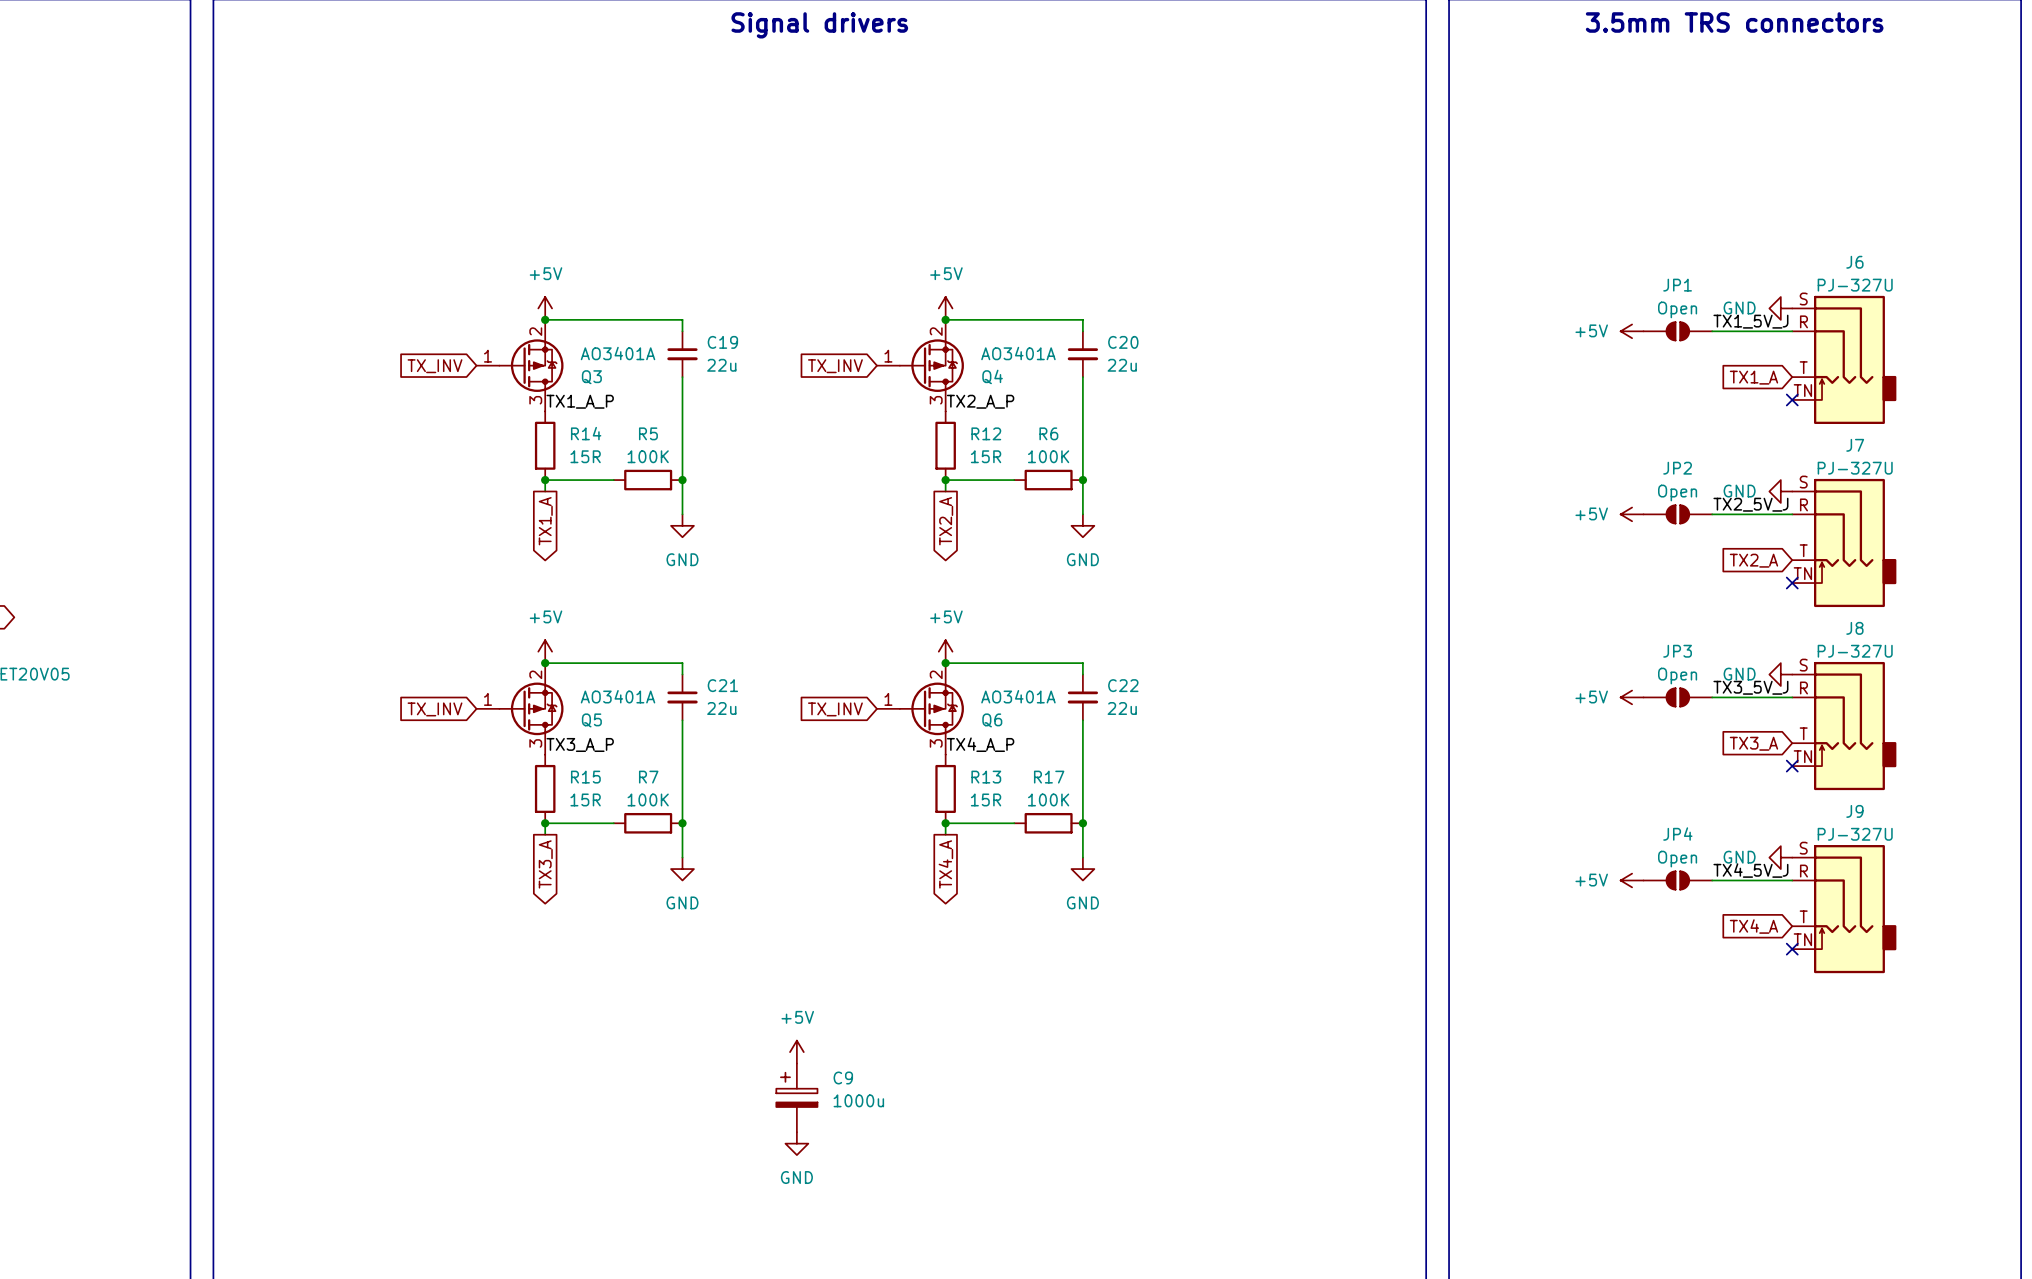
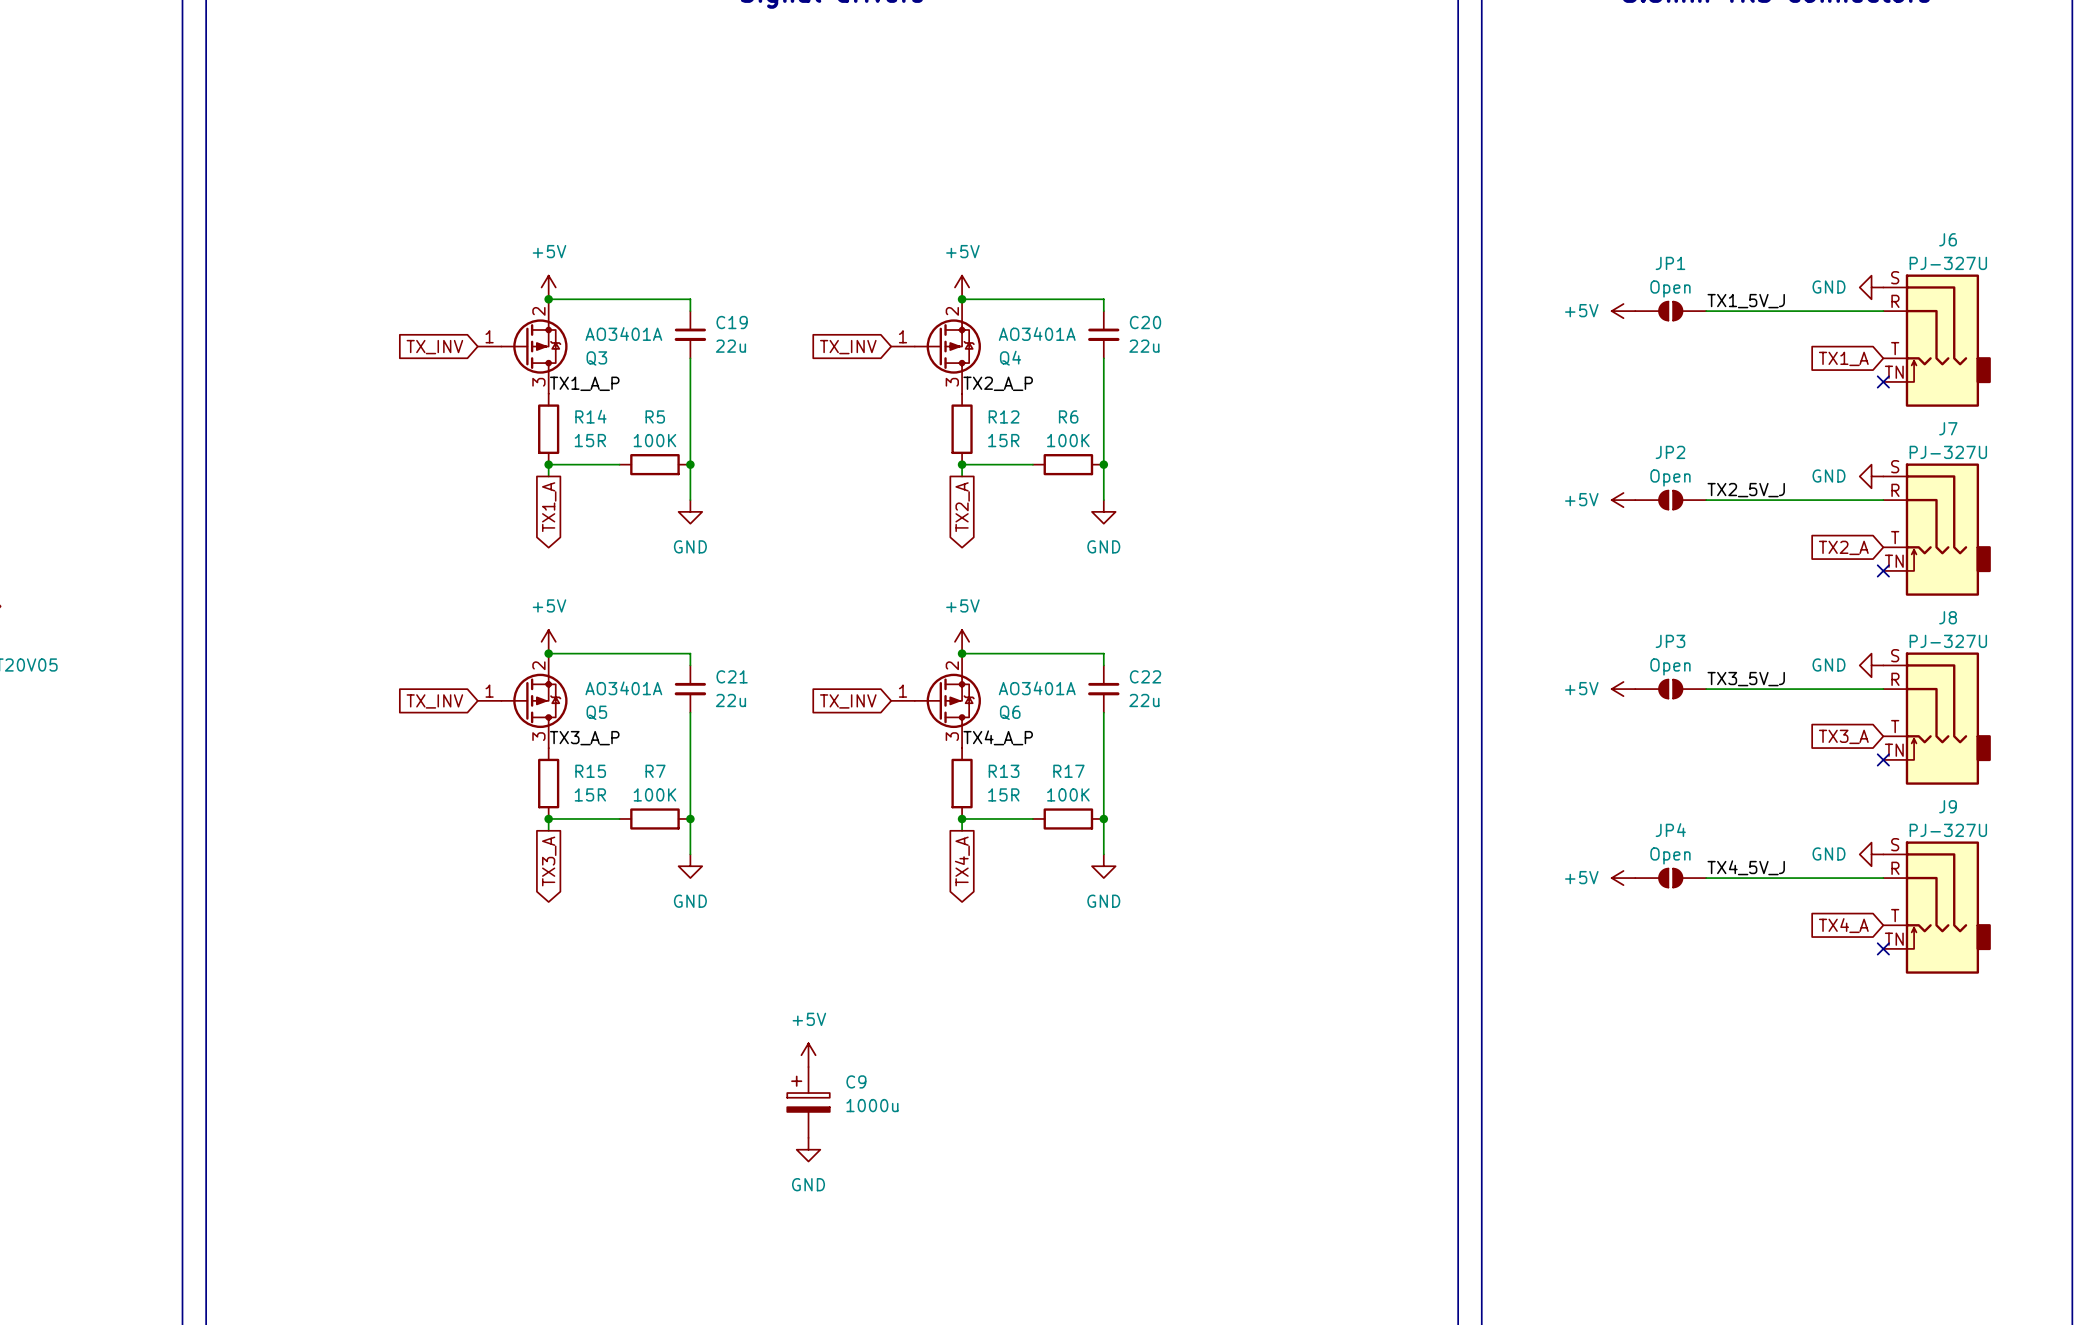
power symbol position: GND (1780, 308) -> GND (1871, 287)
label position: TX1_5V_J (1750, 321) -> TX1_5V_J (1746, 301)
power symbol position: +5V (1632, 331) -> +5V (1623, 311)
JP1 position: (1677, 331) -> (1670, 311)
J6 position: (1844, 359) -> (1937, 340)
global label position: TX1_A (1753, 377) -> TX1_A (1843, 358)
no-connect mark position: (1792, 399) -> (1883, 381)
power symbol position: GND (1780, 491) -> GND (1871, 476)
label position: TX2_5V_J (1750, 504) -> TX2_5V_J (1746, 490)
power symbol position: +5V (1632, 514) -> +5V (1623, 500)
JP2 position: (1677, 514) -> (1670, 500)
J7 position: (1844, 542) -> (1937, 529)
global label position: TX2_A (1753, 560) -> TX2_A (1843, 547)
no-connect mark position: (1792, 583) -> (1883, 570)
power symbol position: GND (1780, 674) -> GND (1871, 665)
label position: TX3_5V_J (1750, 687) -> TX3_5V_J (1746, 679)
power symbol position: +5V (1632, 697) -> +5V (1623, 689)
JP3 position: (1677, 697) -> (1670, 689)
J8 position: (1844, 726) -> (1937, 718)
global label position: TX3_A (1753, 743) -> TX3_A (1843, 736)
no-connect mark position: (1792, 766) -> (1883, 759)
power symbol position: GND (1780, 857) -> GND (1871, 854)
label position: TX4_5V_J (1750, 870) -> TX4_5V_J (1746, 867)
power symbol position: +5V (1632, 880) -> +5V (1623, 878)
JP4 position: (1677, 880) -> (1670, 878)
J9 position: (1844, 909) -> (1937, 907)
global label position: TX4_A (1753, 926) -> TX4_A (1843, 925)
no-connect mark position: (1792, 949) -> (1883, 948)

